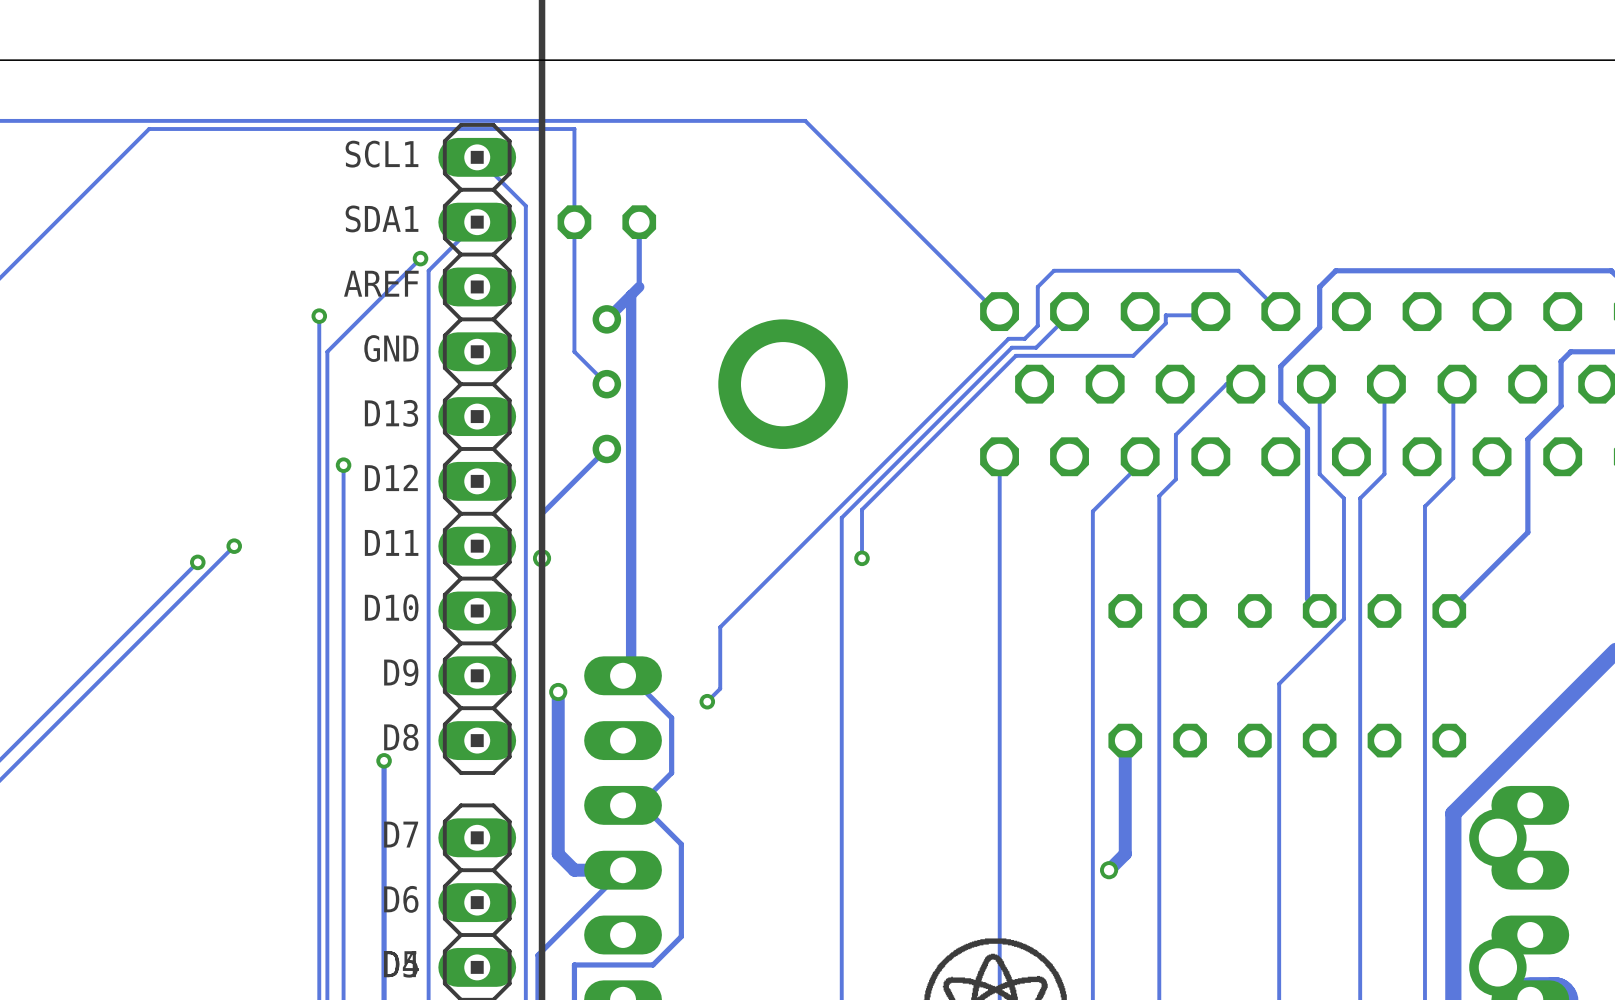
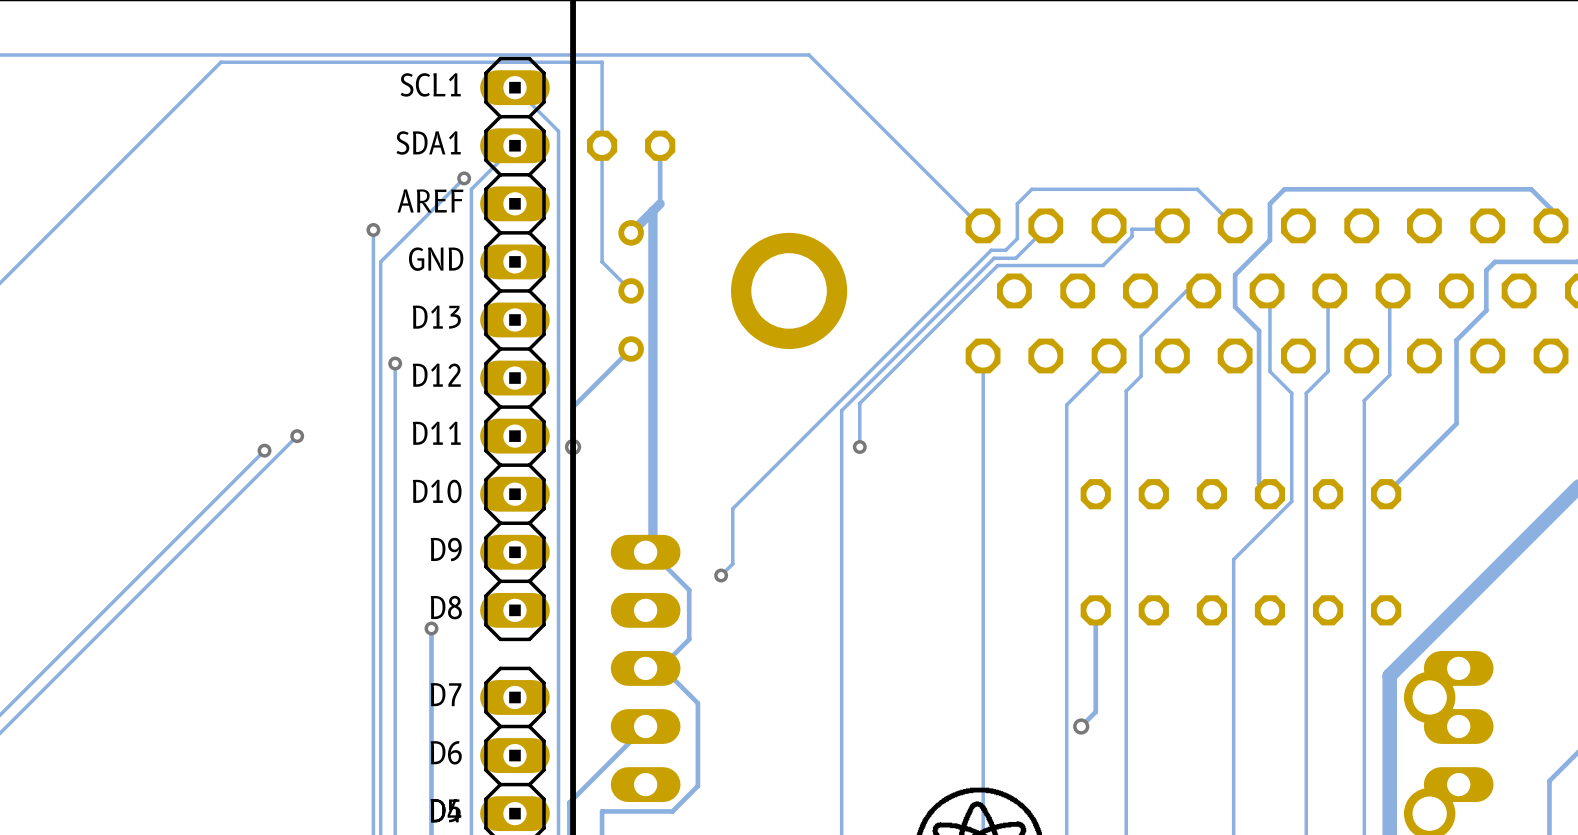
track: (558, 691) (558, 854) (574, 870) (623, 870) -> none
via: (558, 691) -> none
track width: thick (1125, 740) (1125, 854) (1109, 870) -> thin (1095, 610) (1095, 711) (1081, 726)

